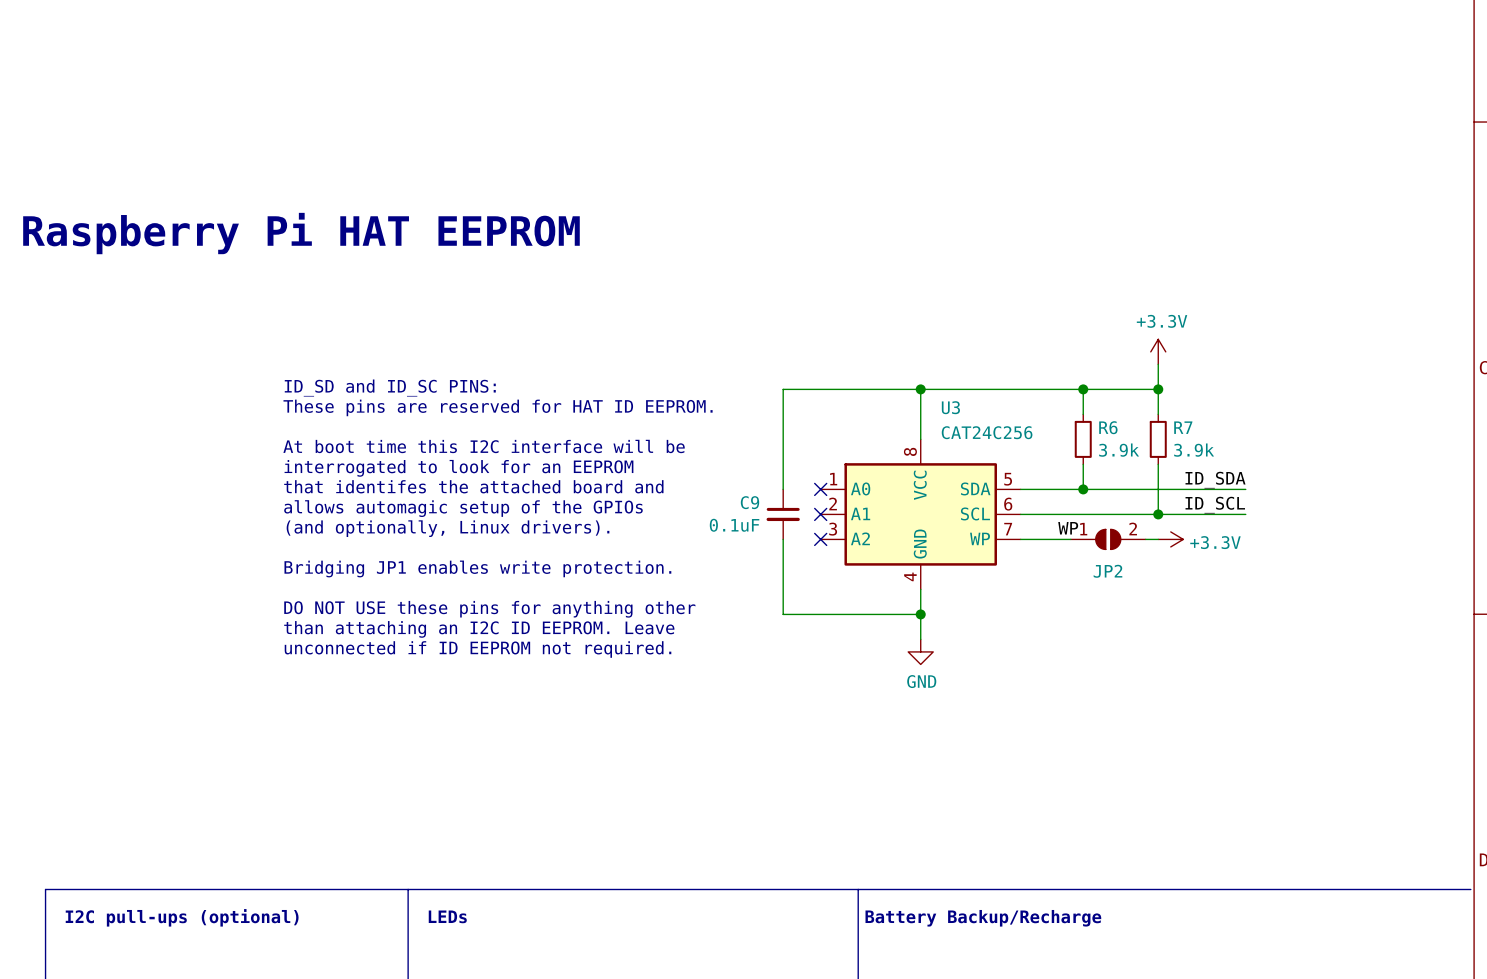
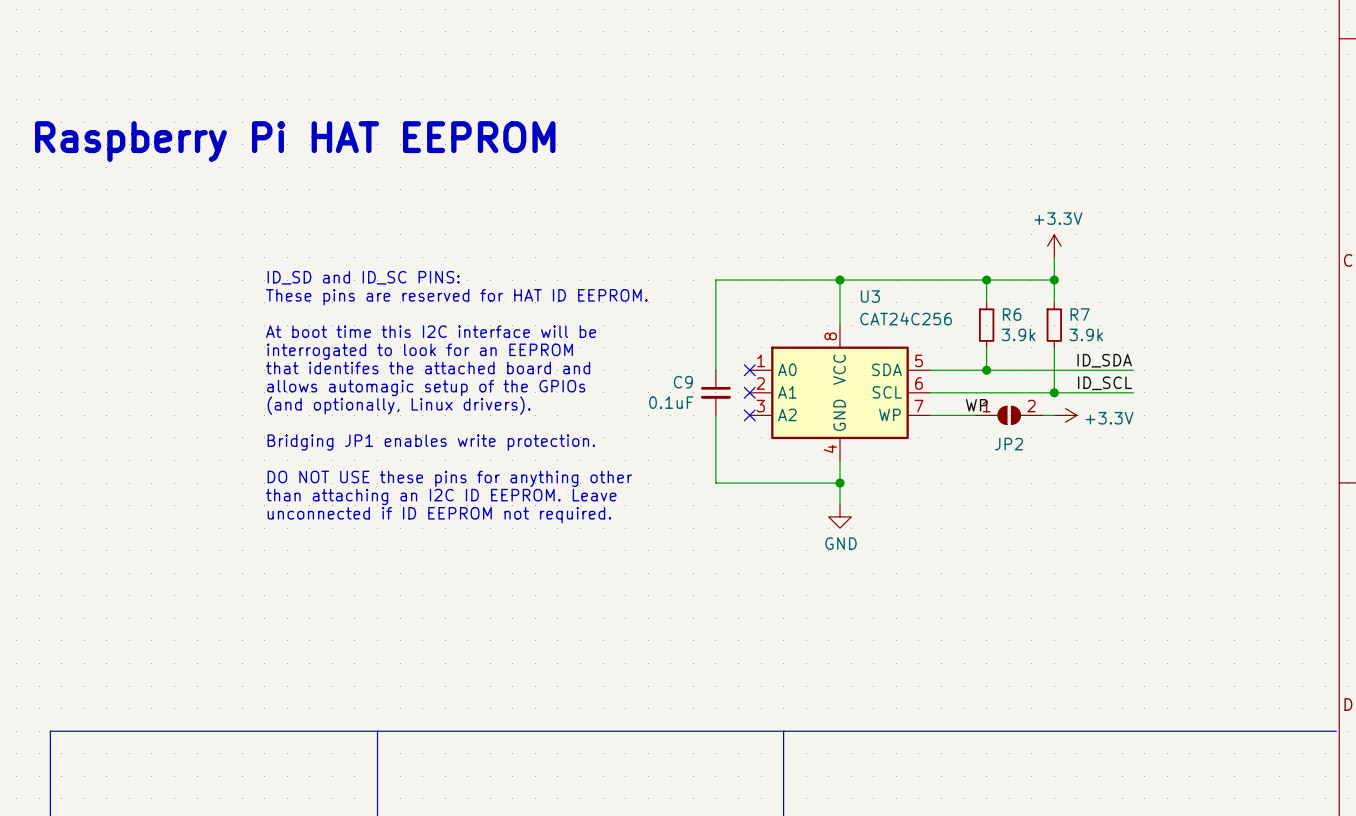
text: LEDs (447, 916) -> none
text: I2C pull-ups (optional) (182, 917) -> none
text: Battery Backup/Recharge (983, 918) -> none

